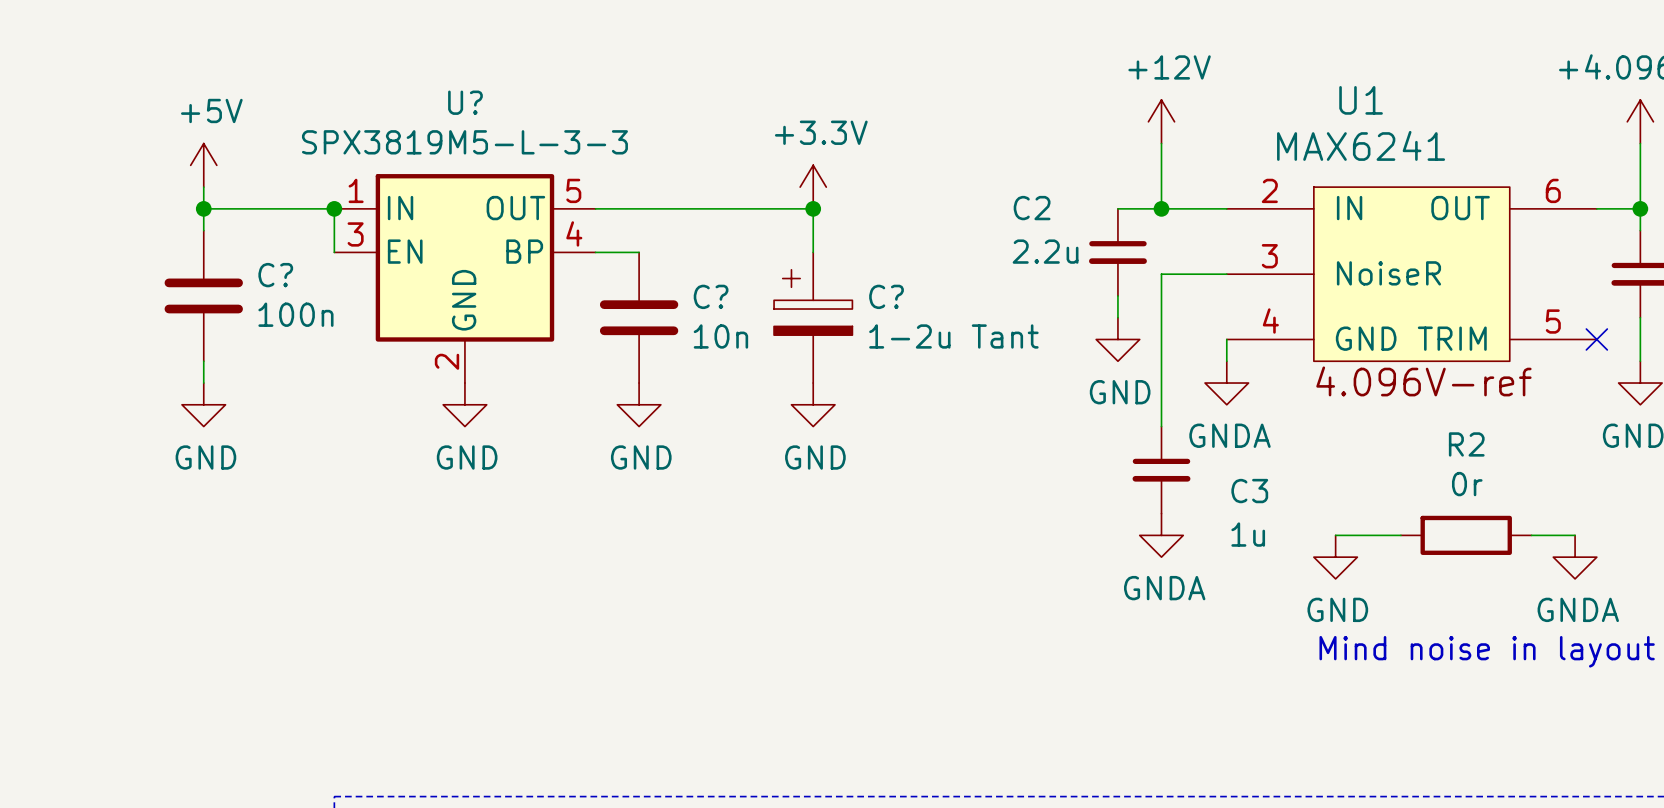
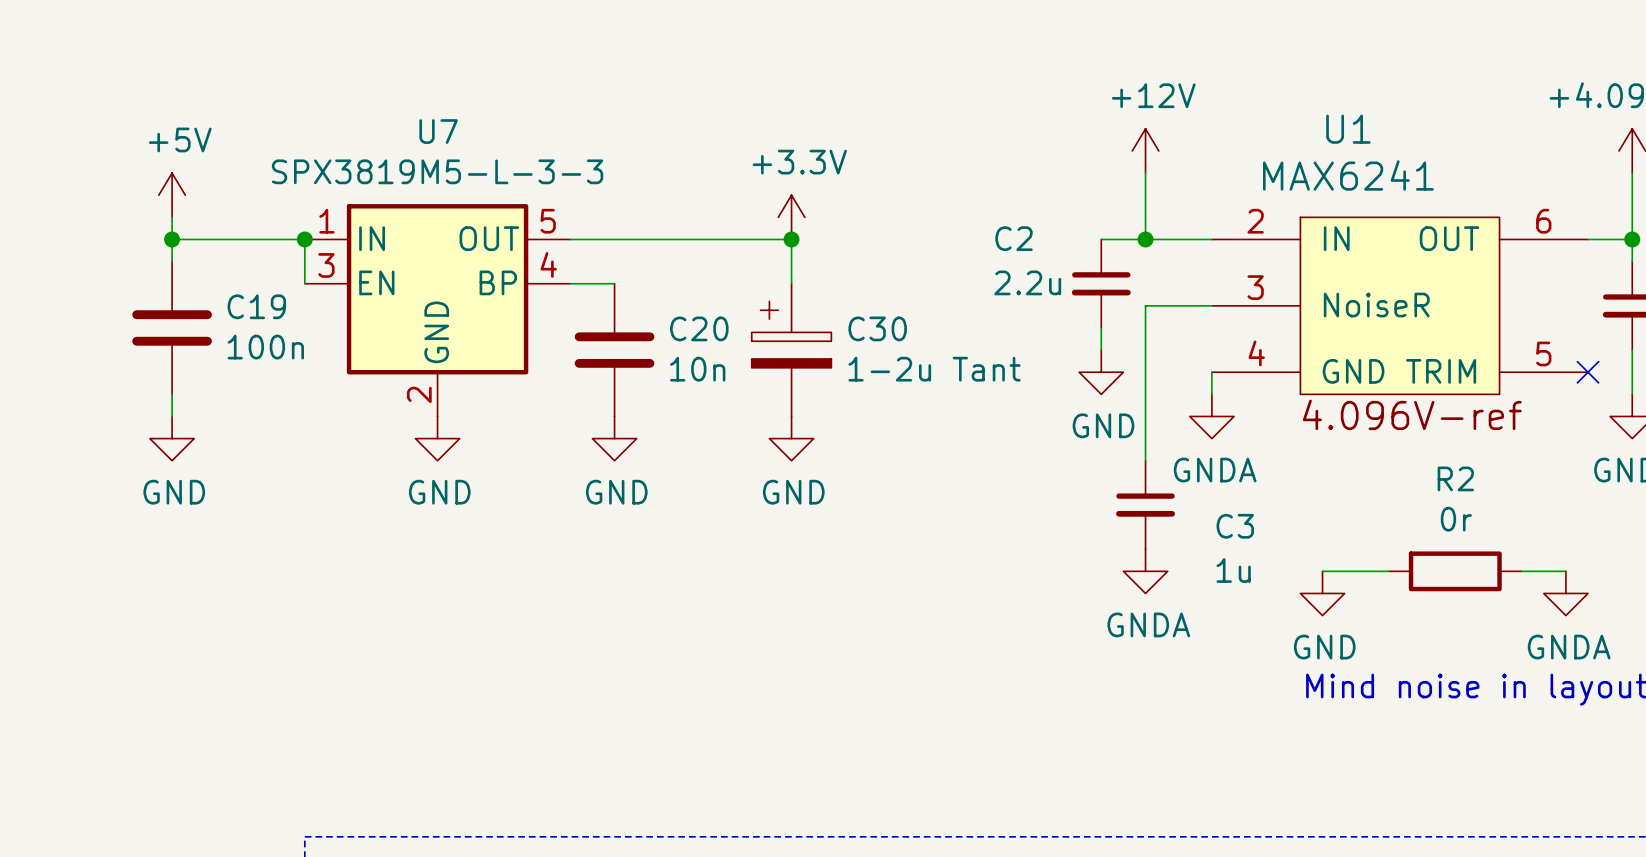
U? name: U? (465, 102) -> U7 (438, 131)
C? name: C? (275, 275) -> C19 (256, 306)
C? name: C? (711, 296) -> C20 (699, 328)
C? name: C? (886, 296) -> C30 (877, 328)

